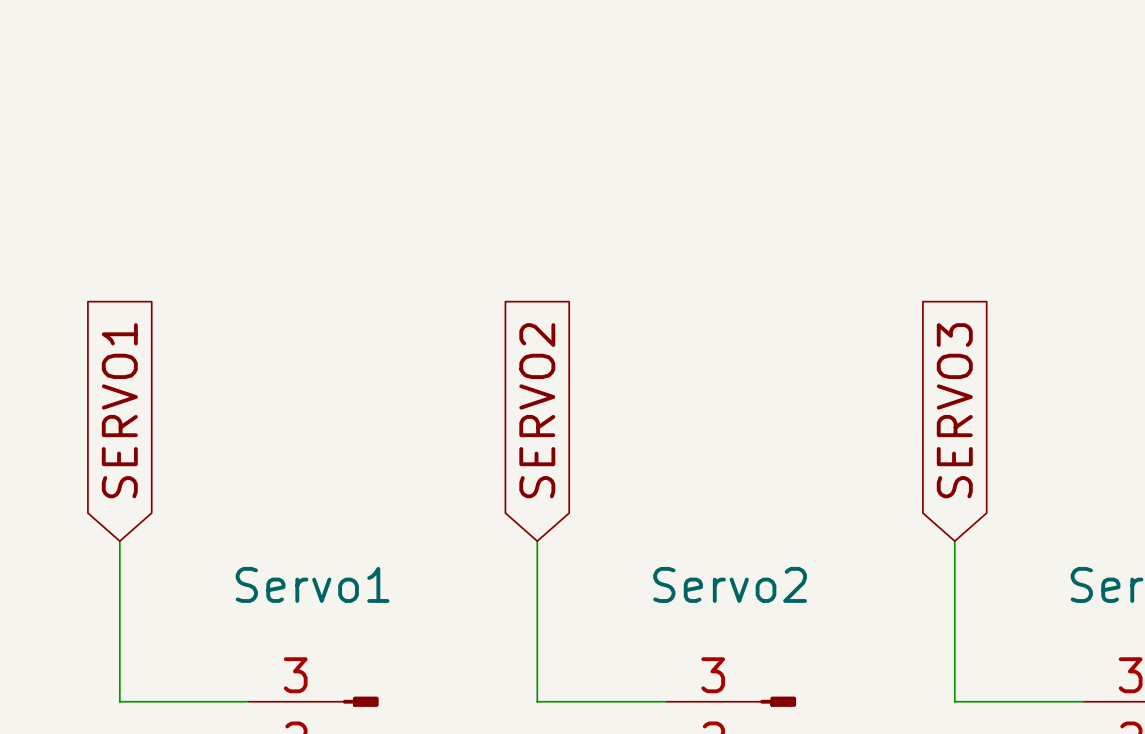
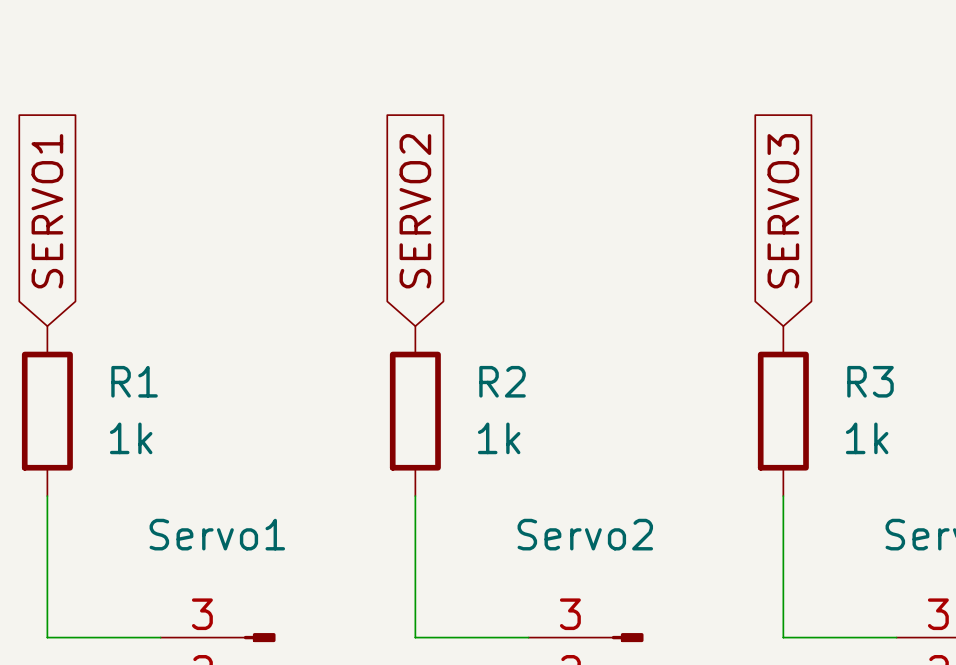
global label position: SERVO1 (119, 410) -> SERVO1 (47, 211)
global label position: SERVO2 (537, 410) -> SERVO2 (415, 211)
global label position: SERVO3 (954, 410) -> SERVO3 (783, 211)
R1: none -> 1k (47, 411)
R2: none -> 1k (415, 411)
R3: none -> 1k (783, 411)

